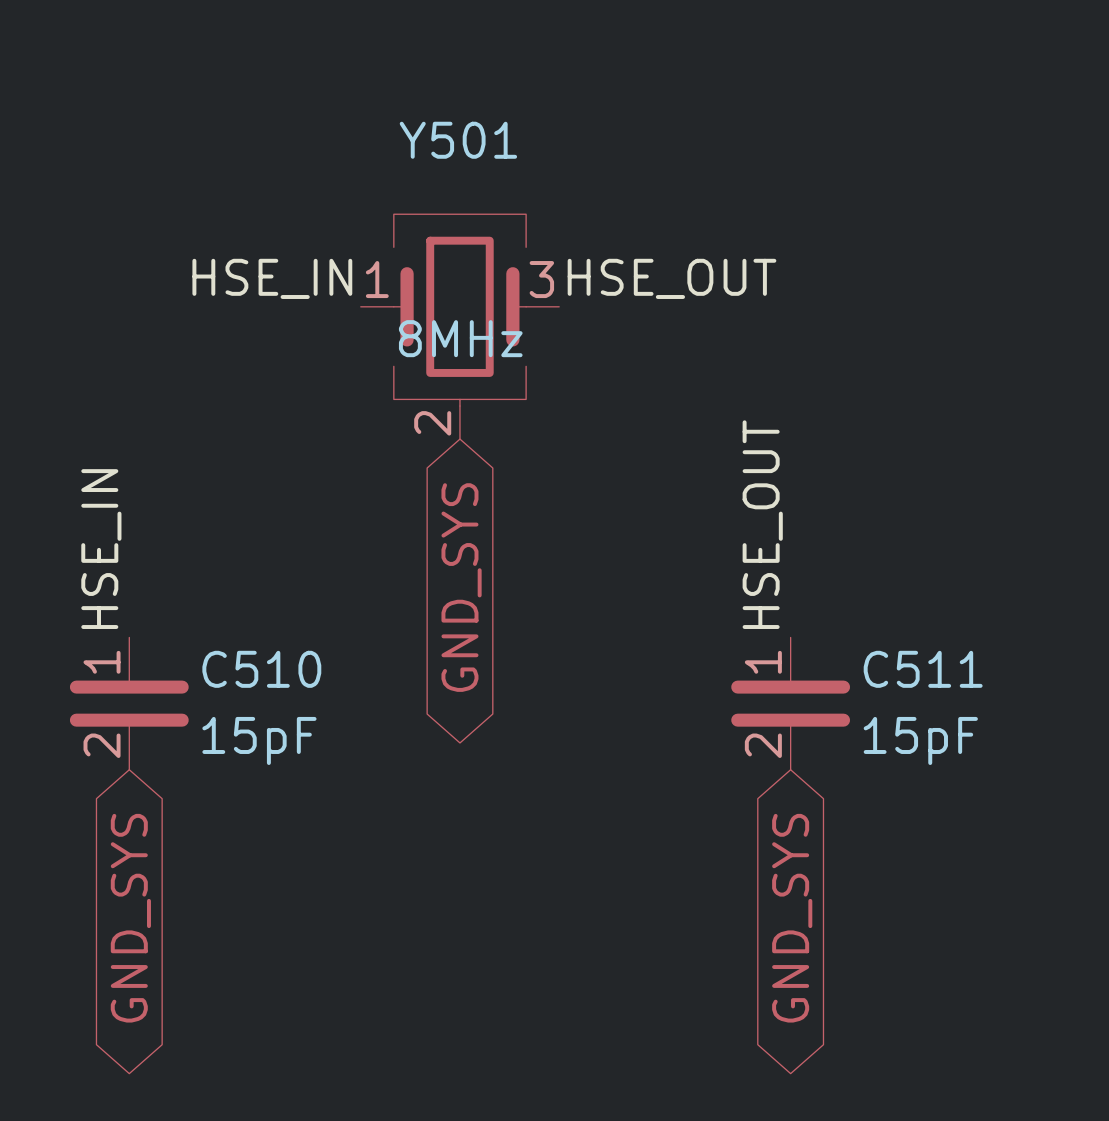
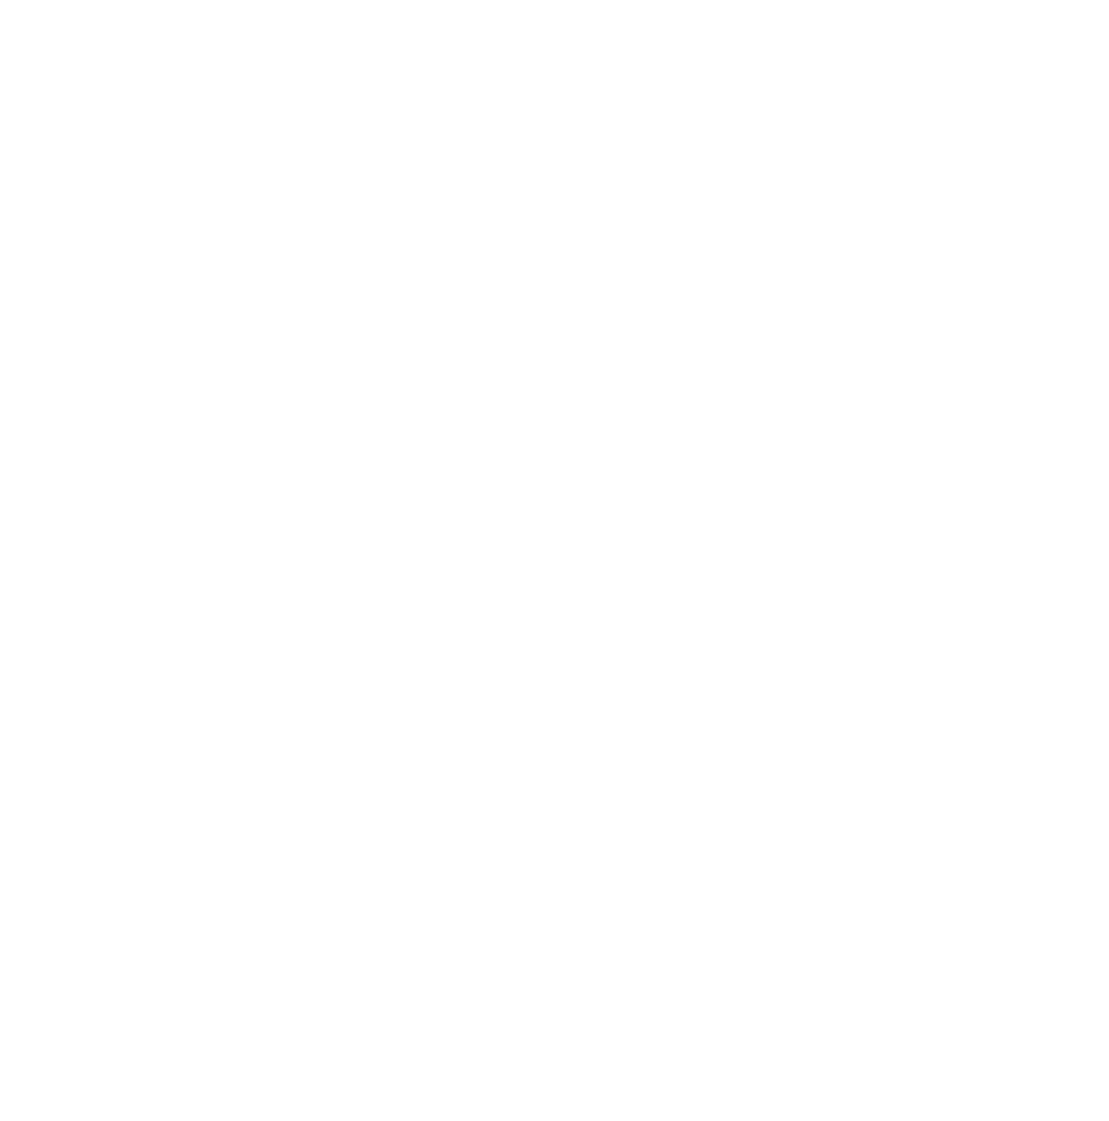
label: HSE_IN (272, 278) -> none
label: HSE_OUT (672, 278) -> none
Y501: 8MHz (459, 326) -> none
label: HSE_OUT (762, 524) -> none
label: HSE_IN (101, 549) -> none
global label: GND_SYS (461, 587) -> none
C510: 15pF (129, 703) -> none
C511: 15pF (790, 703) -> none
global label: GND_SYS (130, 918) -> none
global label: GND_SYS (792, 918) -> none

